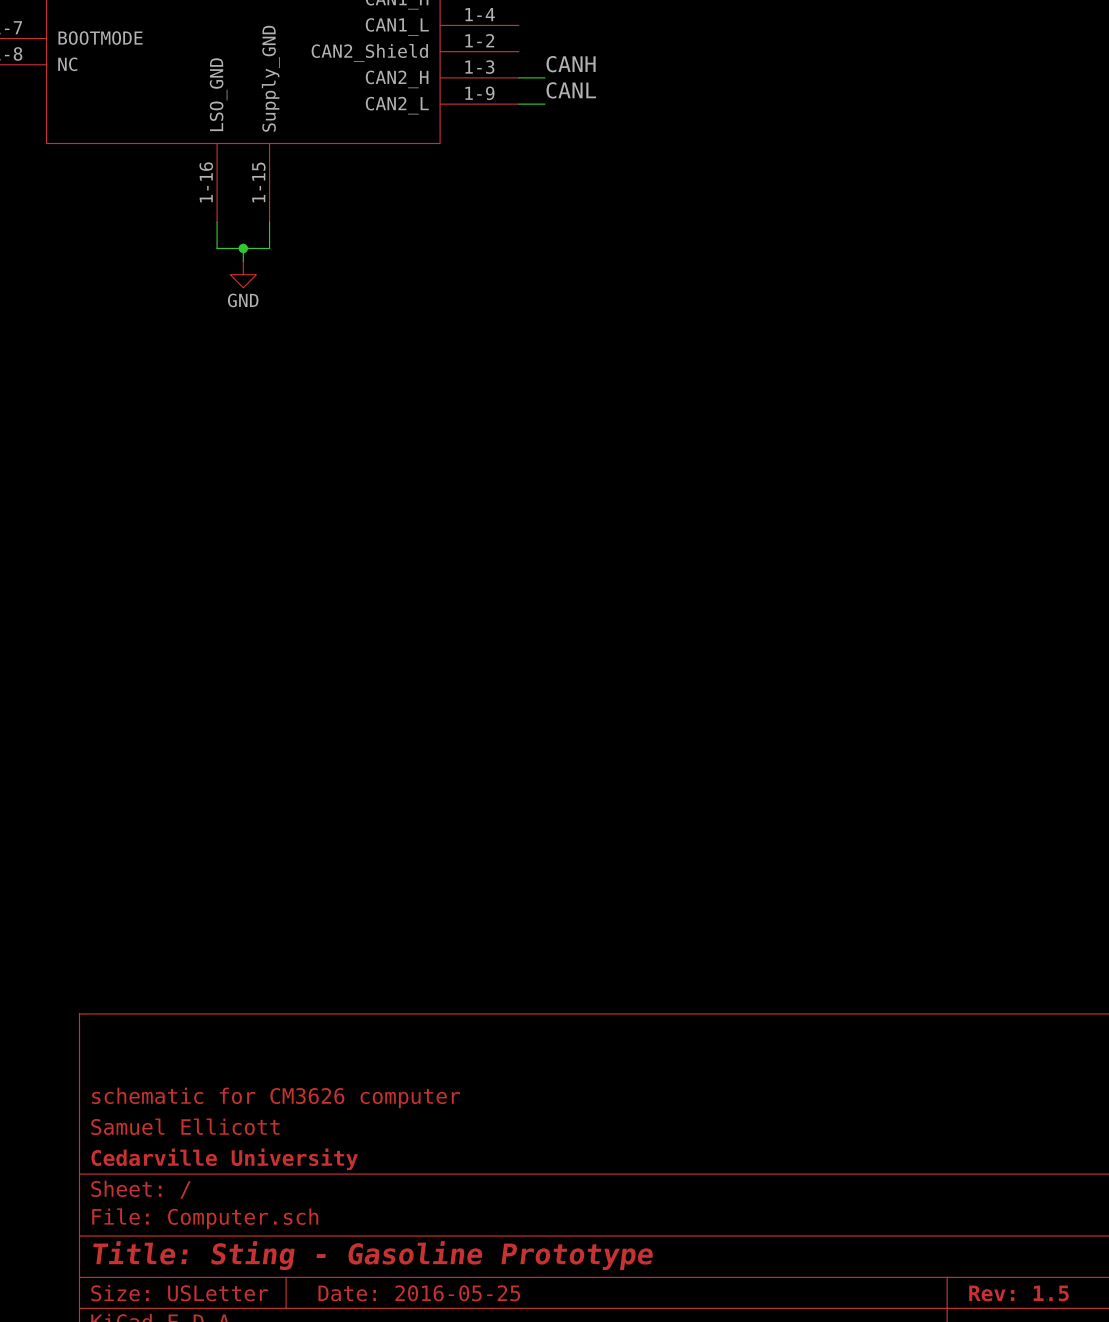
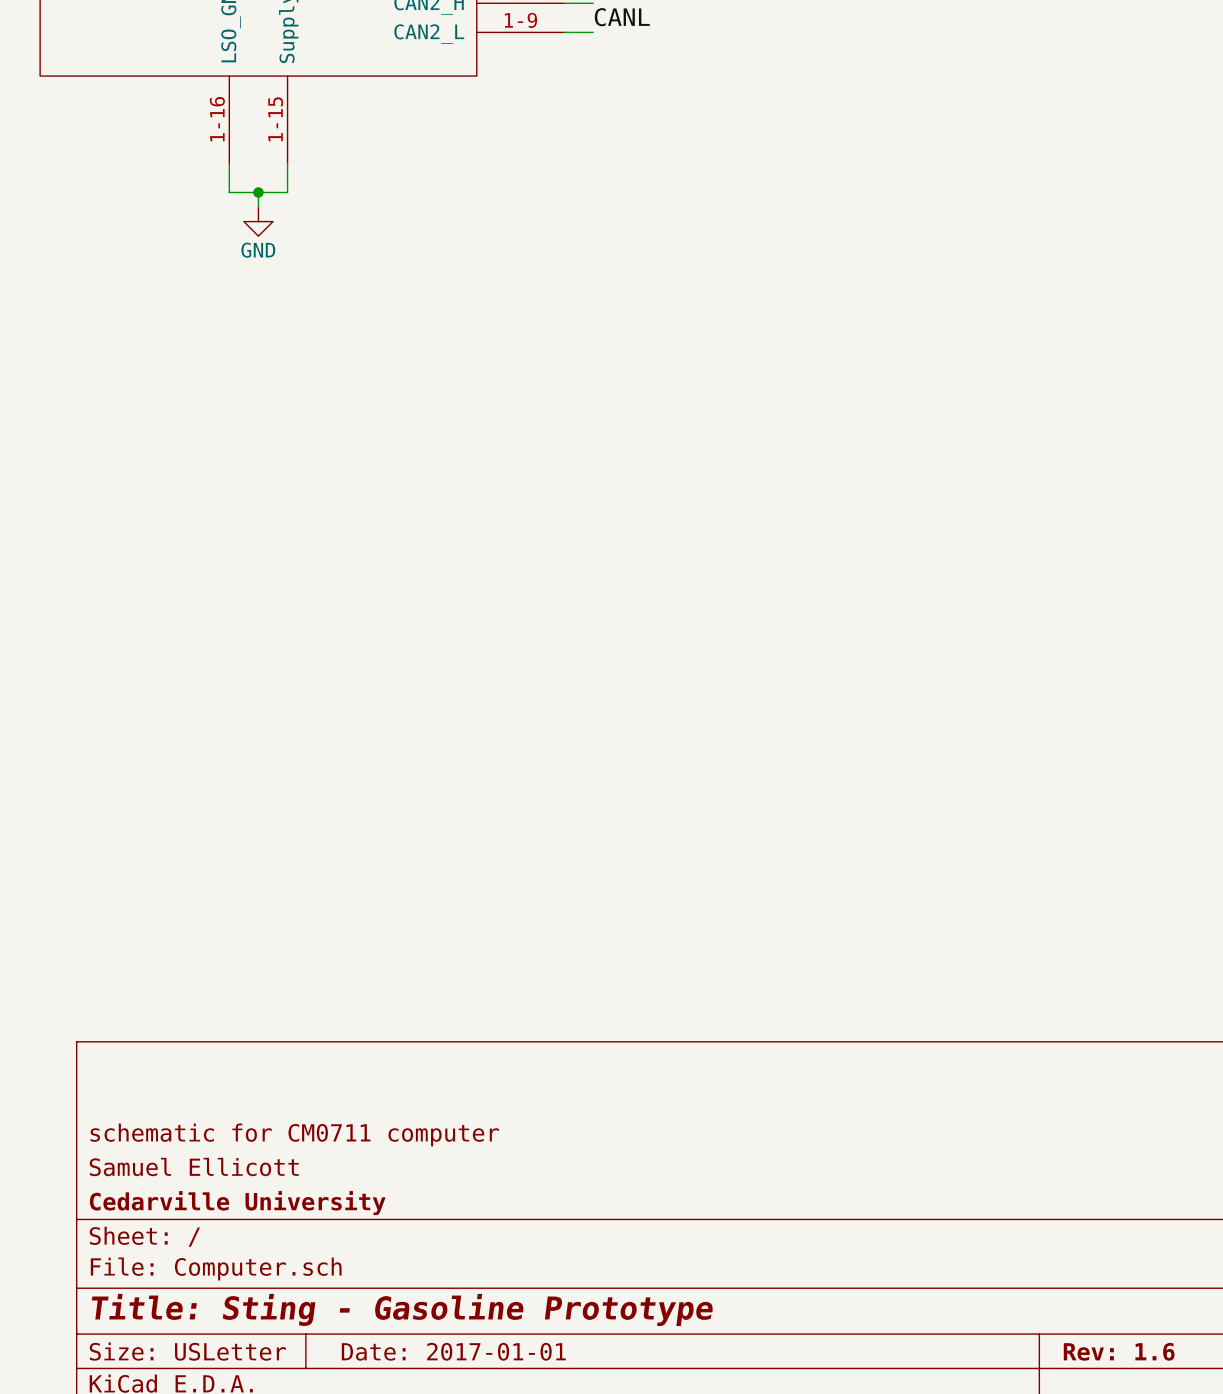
title block: schematic for CM3626 computer (276, 1097) -> schematic for CM0711 computer (294, 1134)
title block: Date: 2016-05-25 (419, 1293) -> Date: 2017-01-01 (453, 1351)
title block: Rev: 1.5 (1018, 1293) -> Rev: 1.6 (1119, 1351)

